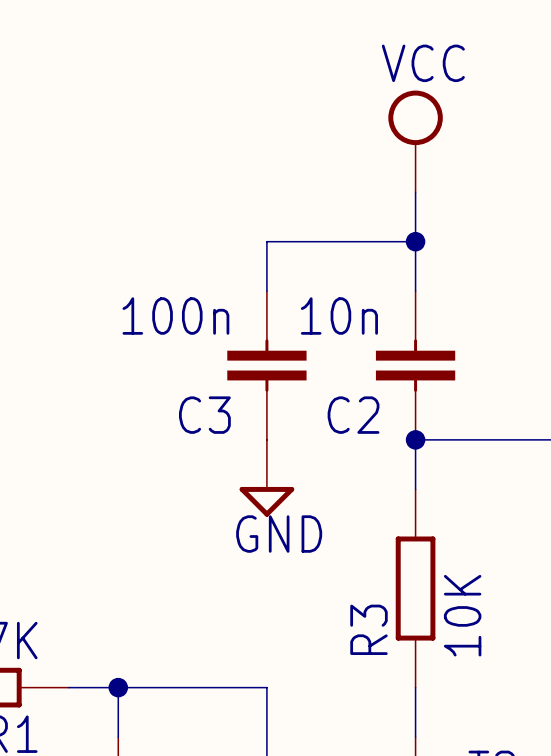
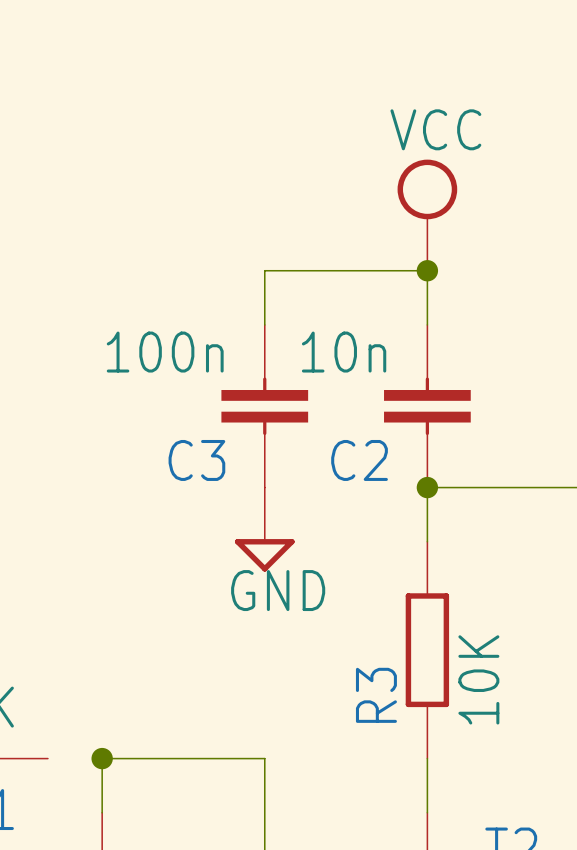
power symbol position: VCC (415, 141) -> VCC (427, 215)
wire: (68, 687) (118, 687) -> none

